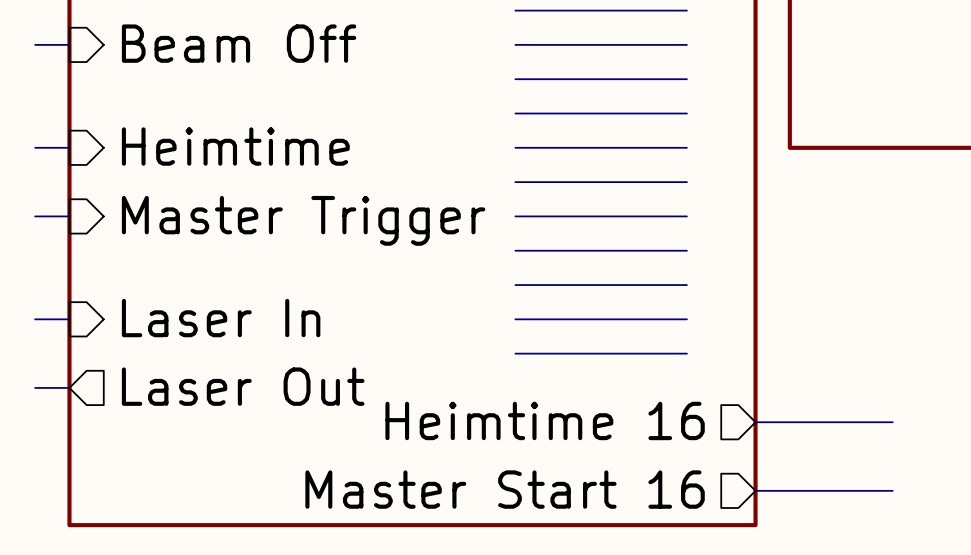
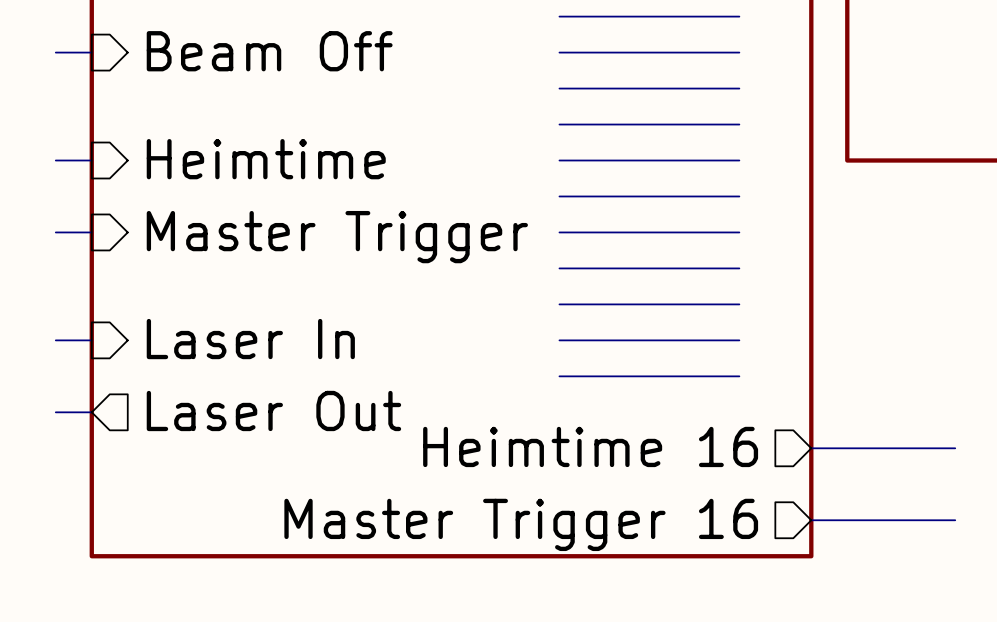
sheet pin: Master Start 16 (505, 489) -> Master Trigger 16 (521, 524)

